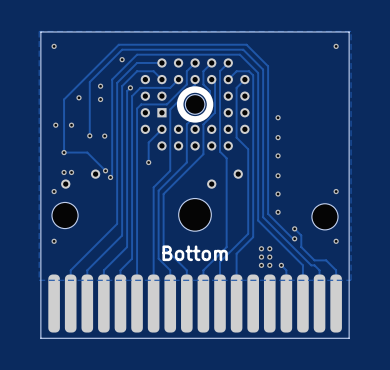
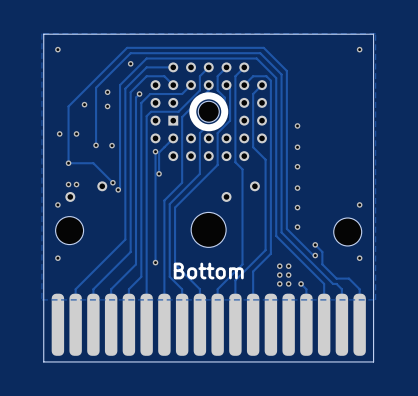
track: none -> (155, 151) (155, 262)
via: none -> (155, 151)
via: none -> (155, 262)

